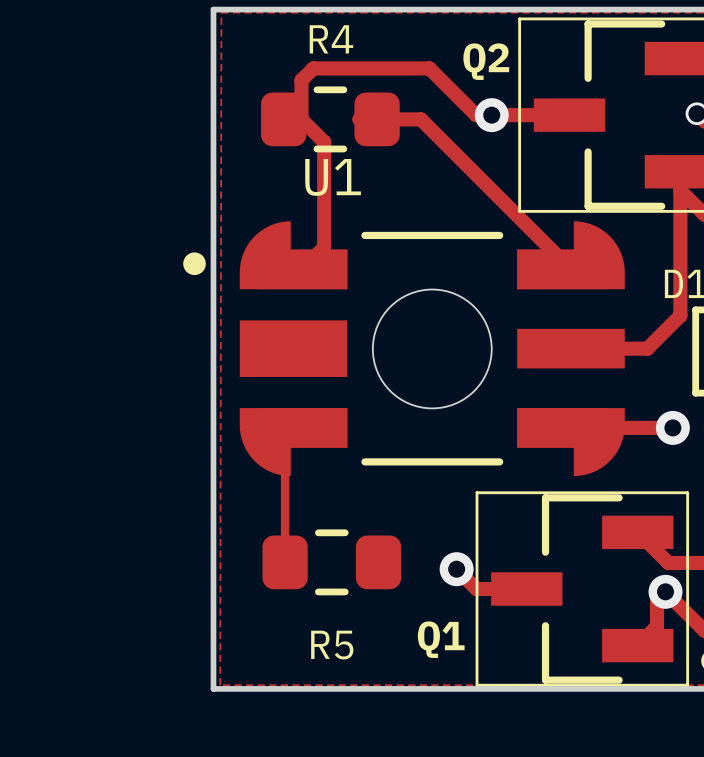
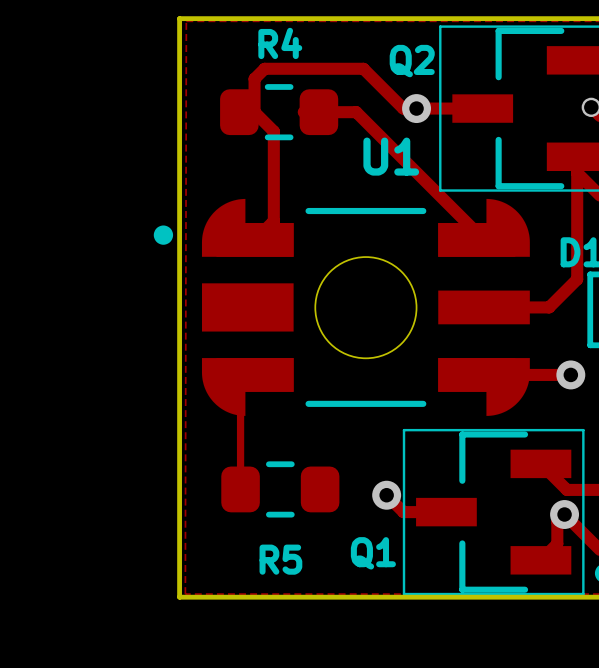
U1 name position: U1 (333, 177) -> U1 (391, 156)

